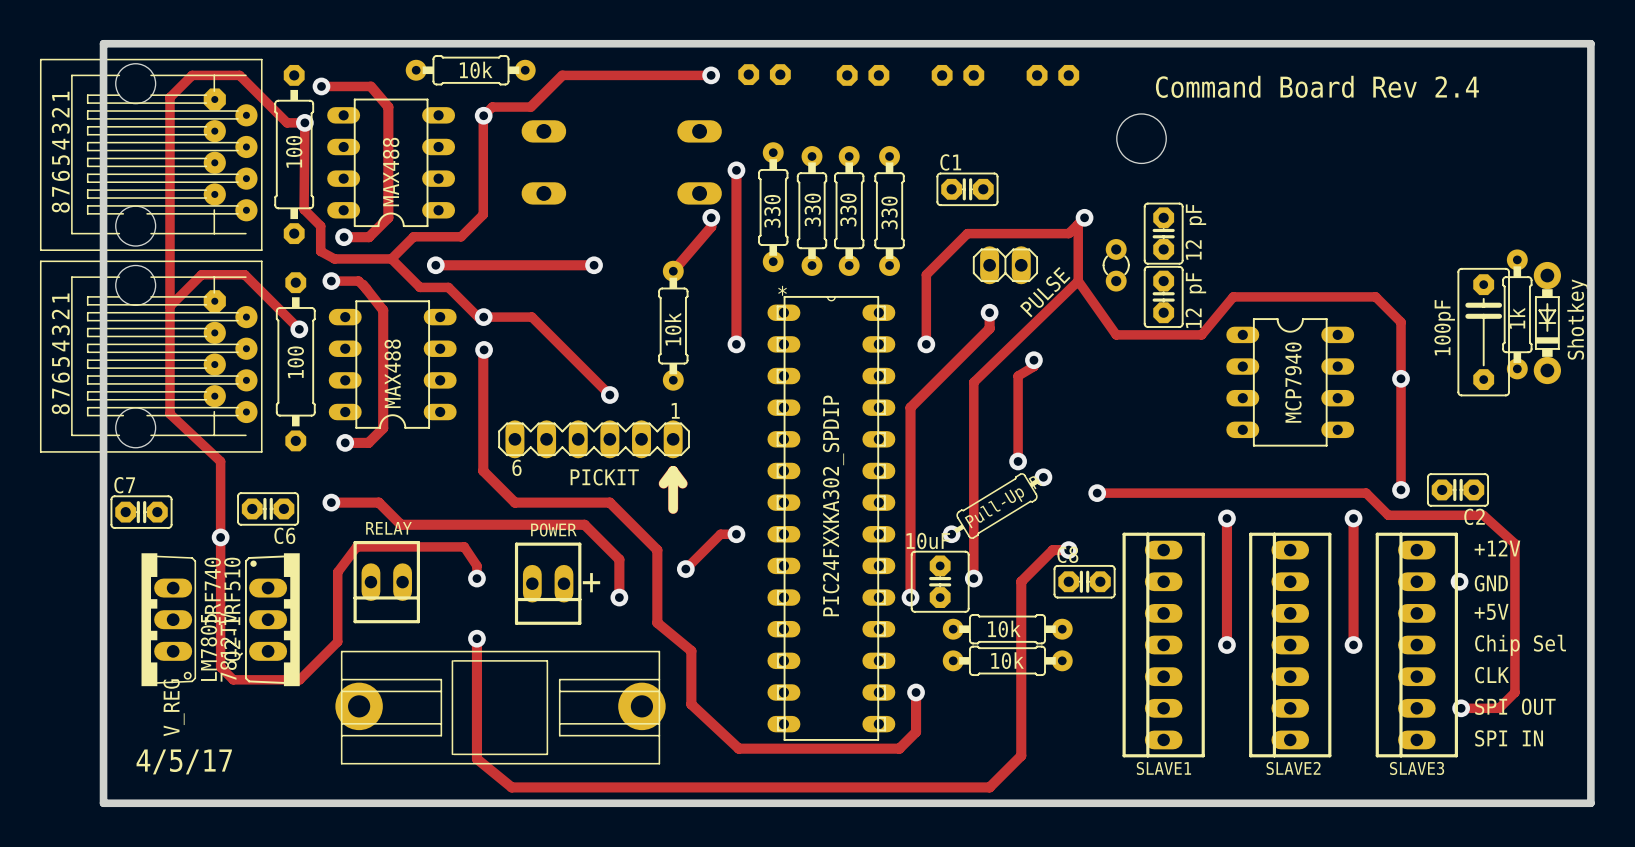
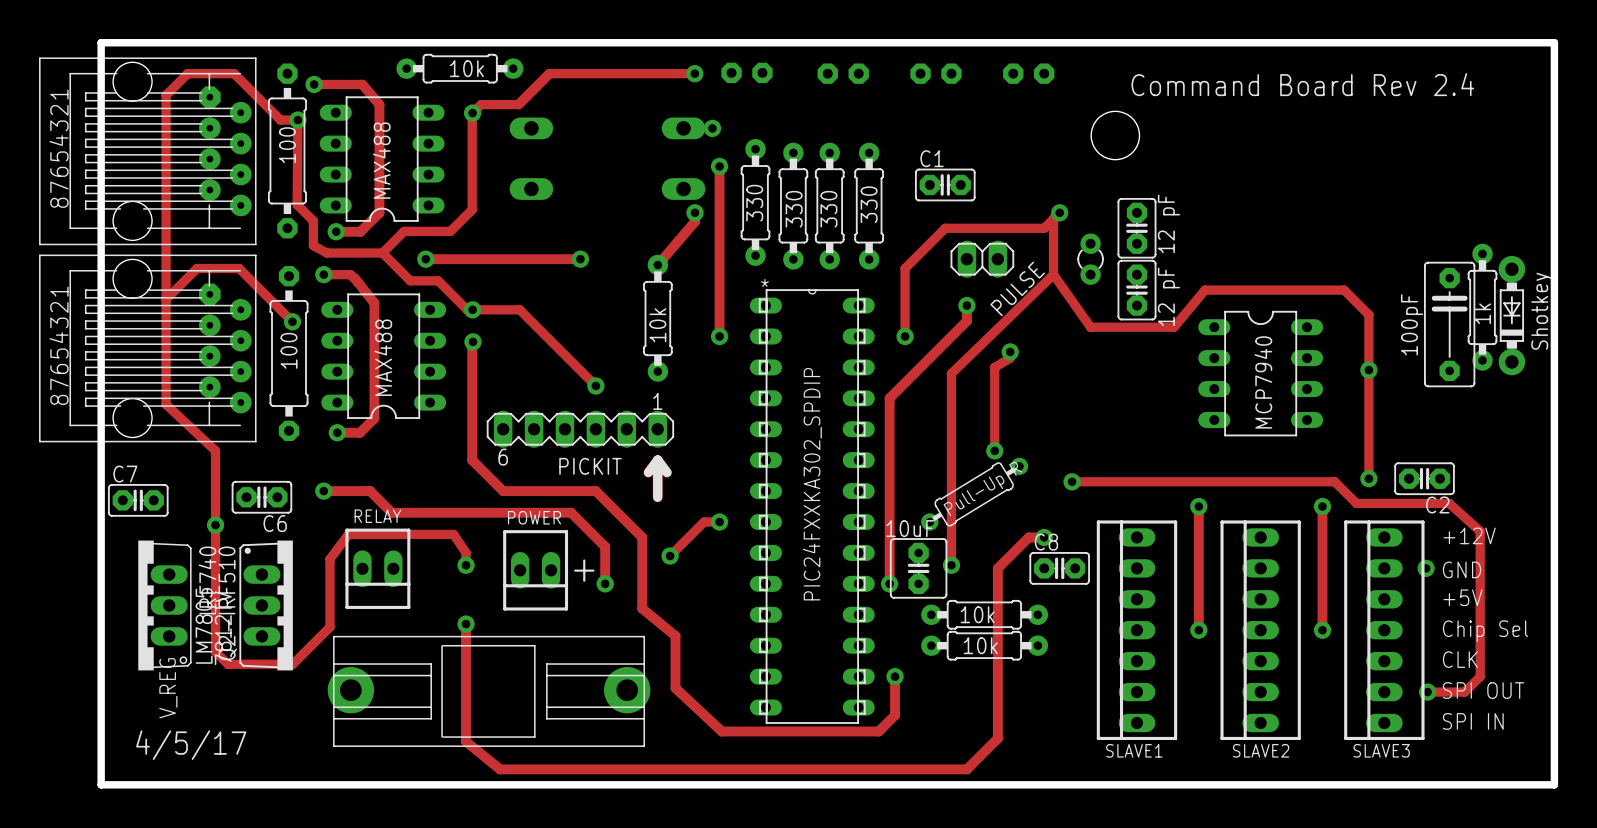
via: none -> (712, 128)

